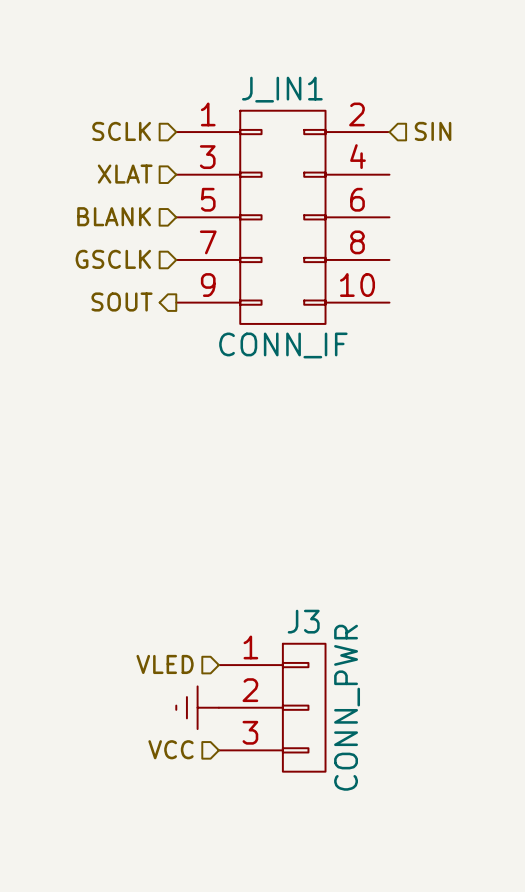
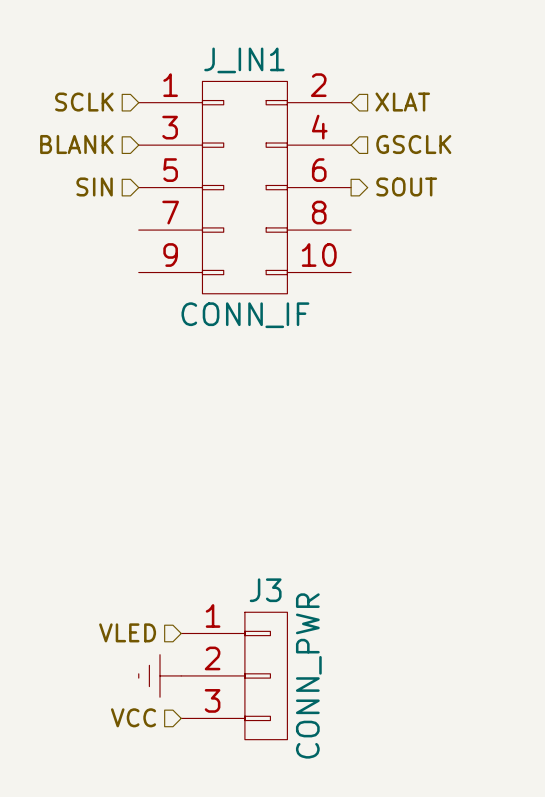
hierarchical label: SIN (433, 131) -> XLAT (402, 102)
hierarchical label: XLAT (125, 174) -> BLANK (76, 144)
hierarchical label: BLANK (114, 216) -> SIN (94, 186)
hierarchical label rotation: 0° (113, 259) -> 180° (413, 144)
hierarchical label position: GSCLK (113, 259) -> GSCLK (413, 144)
hierarchical label rotation: 0° (122, 302) -> 180° (406, 186)
hierarchical label position: SOUT (122, 302) -> SOUT (406, 186)

